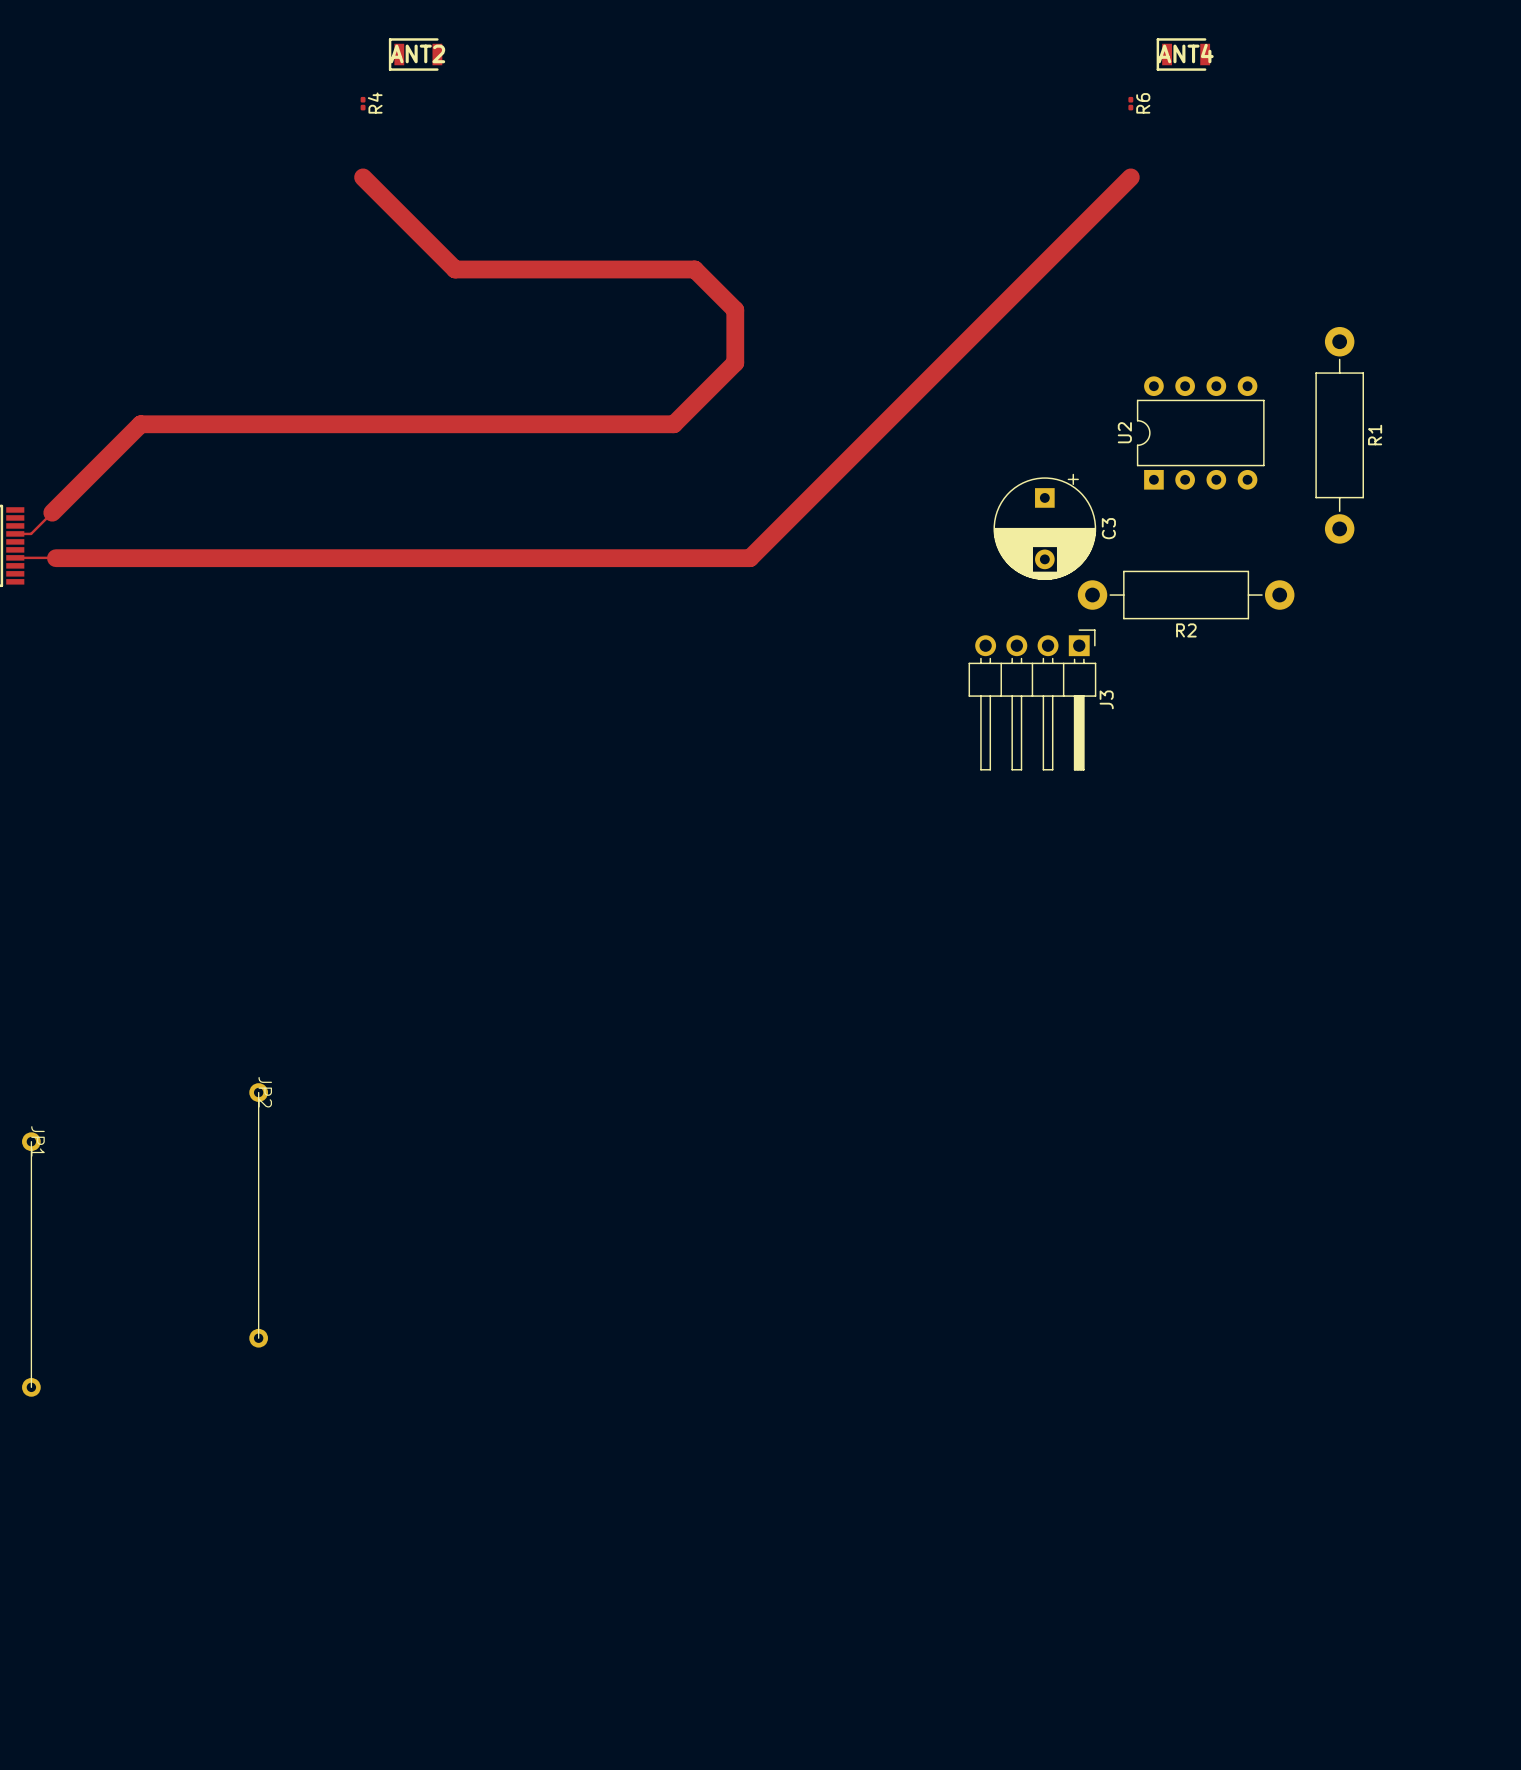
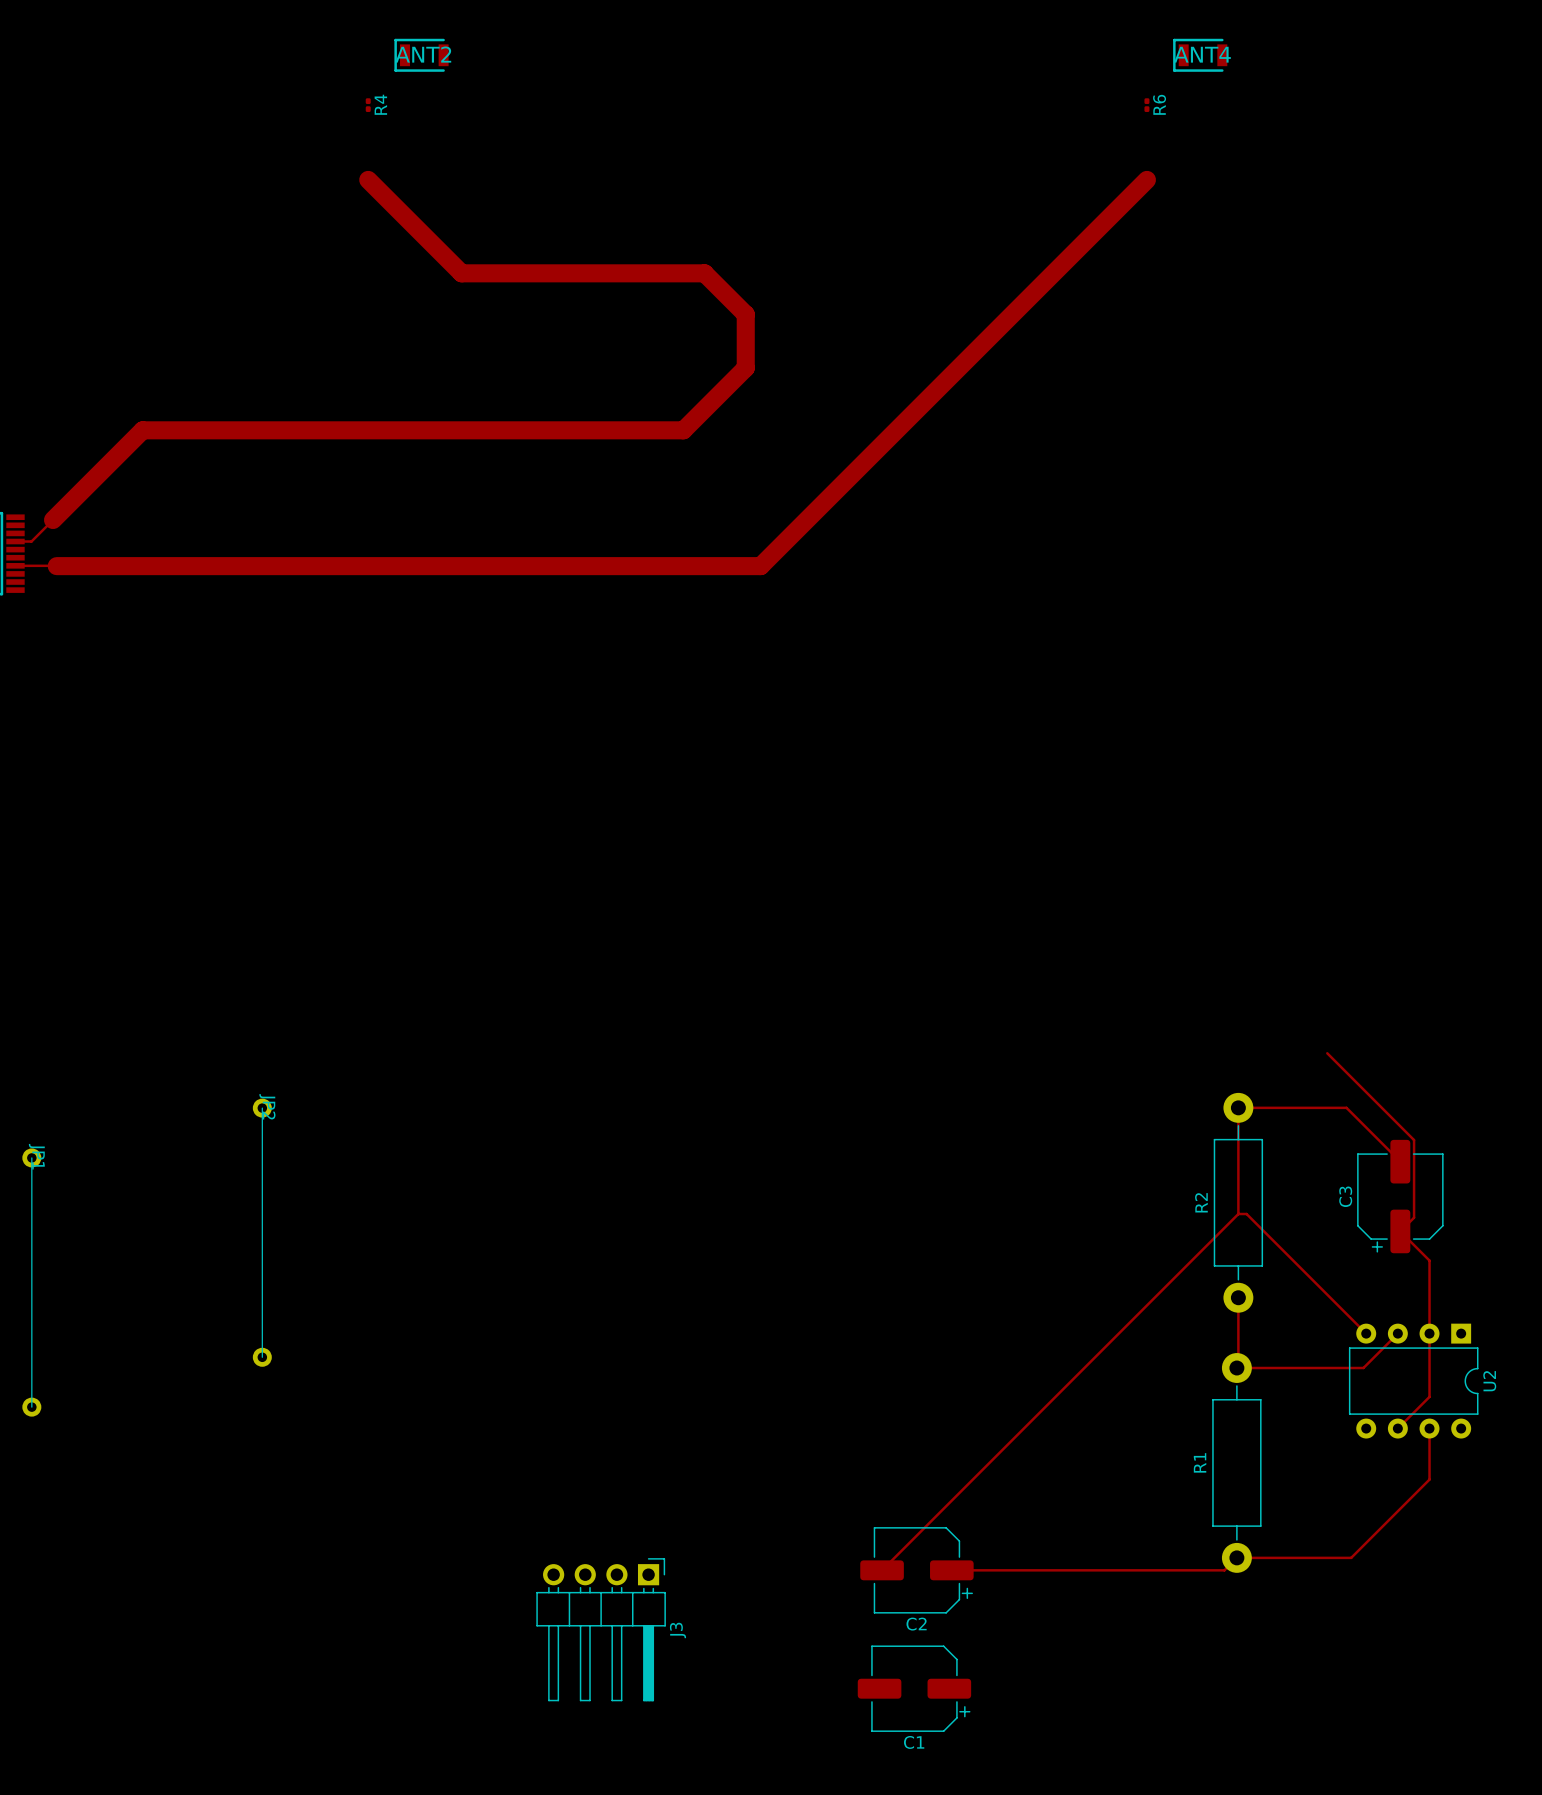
U2 rotation: 0° (1200, 433) -> 180° (1413, 1381)
U2 position: (1200, 433) -> (1413, 1381)
R1 position: (1339, 435) -> (1236, 1462)
R1 name position: R1 (1375, 435) -> R1 (1200, 1462)
C3 footprint: [993, 473, 1097, 581] -> [1357, 1139, 1444, 1254]
C3 name position: C3 (1108, 528) -> C3 (1345, 1196)
R2 rotation: 0° (1186, 595) -> 90° clockwise (1238, 1202)
R2 position: (1186, 595) -> (1238, 1202)
J3 position: (1032, 699) -> (601, 1629)
track: none -> (1327, 1053) (1414, 1140) (1414, 1217) (1400, 1231) (1429, 1260) (1429, 1396) (1397, 1428)
track: none -> (1400, 1161) (1346, 1107) (1238, 1107) (1238, 1214)
track: none -> (1238, 1214) (882, 1570)
track: none -> (1238, 1214) (1246, 1214) (1366, 1333)
track: none -> (1238, 1297) (1236, 1368) (1363, 1368) (1397, 1333)
track: none -> (1429, 1428) (1429, 1479) (1351, 1557) (1236, 1557) (1224, 1570) (951, 1570)
C2: none -> (916, 1570)
C1: none -> (914, 1688)

